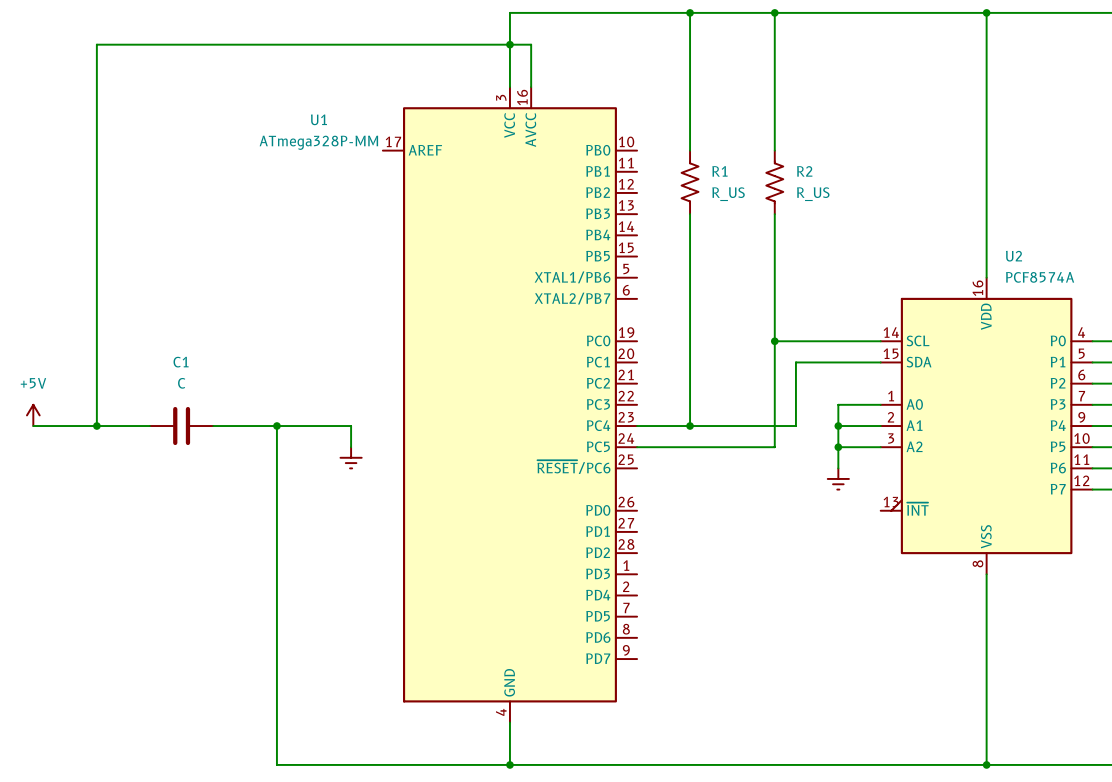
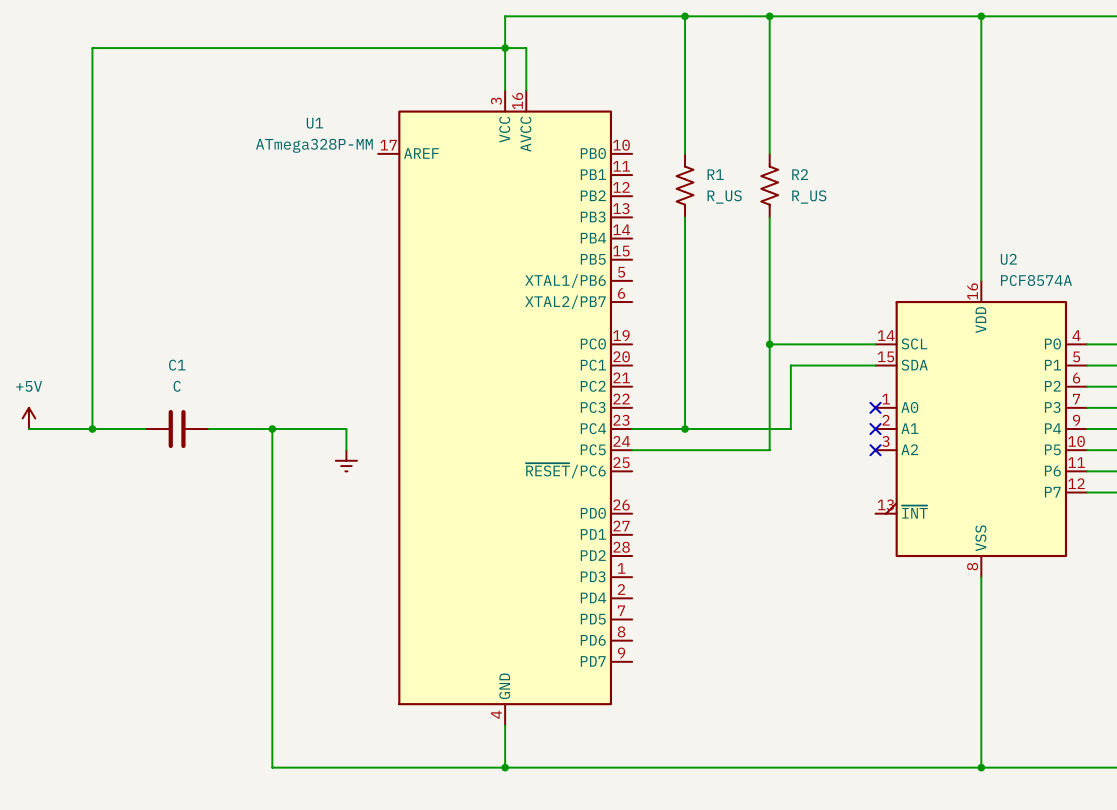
wire: (880, 404) (838, 404) (838, 468) -> none
no-connect mark: none -> (875, 407)
wire: (838, 426) (880, 426) -> none
junction: (838, 426) -> none
no-connect mark: none -> (875, 429)
wire: (838, 447) (880, 447) -> none
junction: (838, 447) -> none
no-connect mark: none -> (875, 450)
power symbol: (838, 478) -> none

